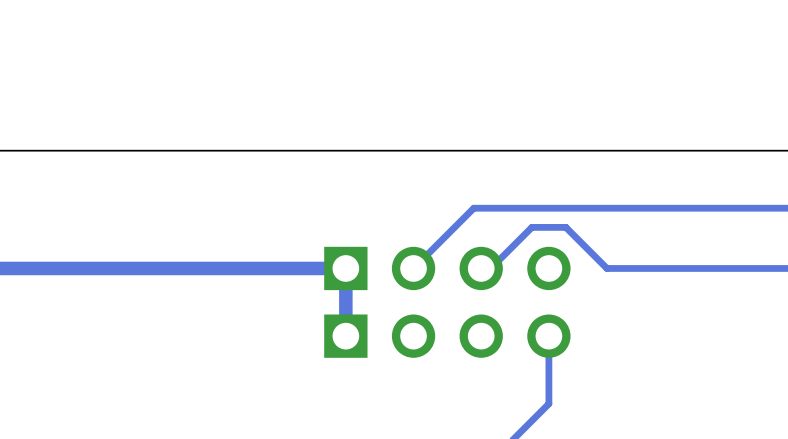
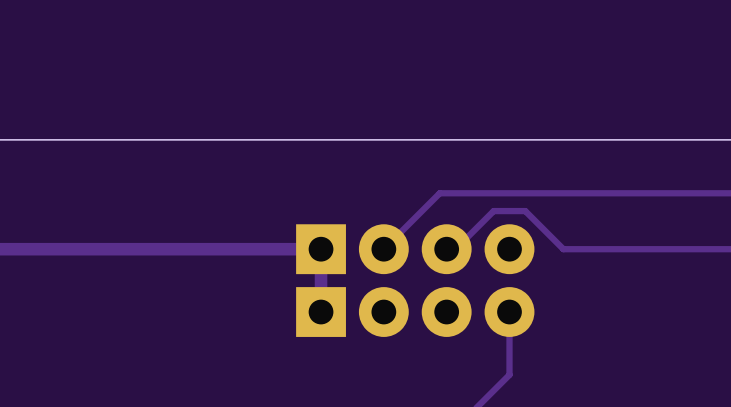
part footprint: [324, 246, 571, 358] -> [296, 224, 535, 337]

